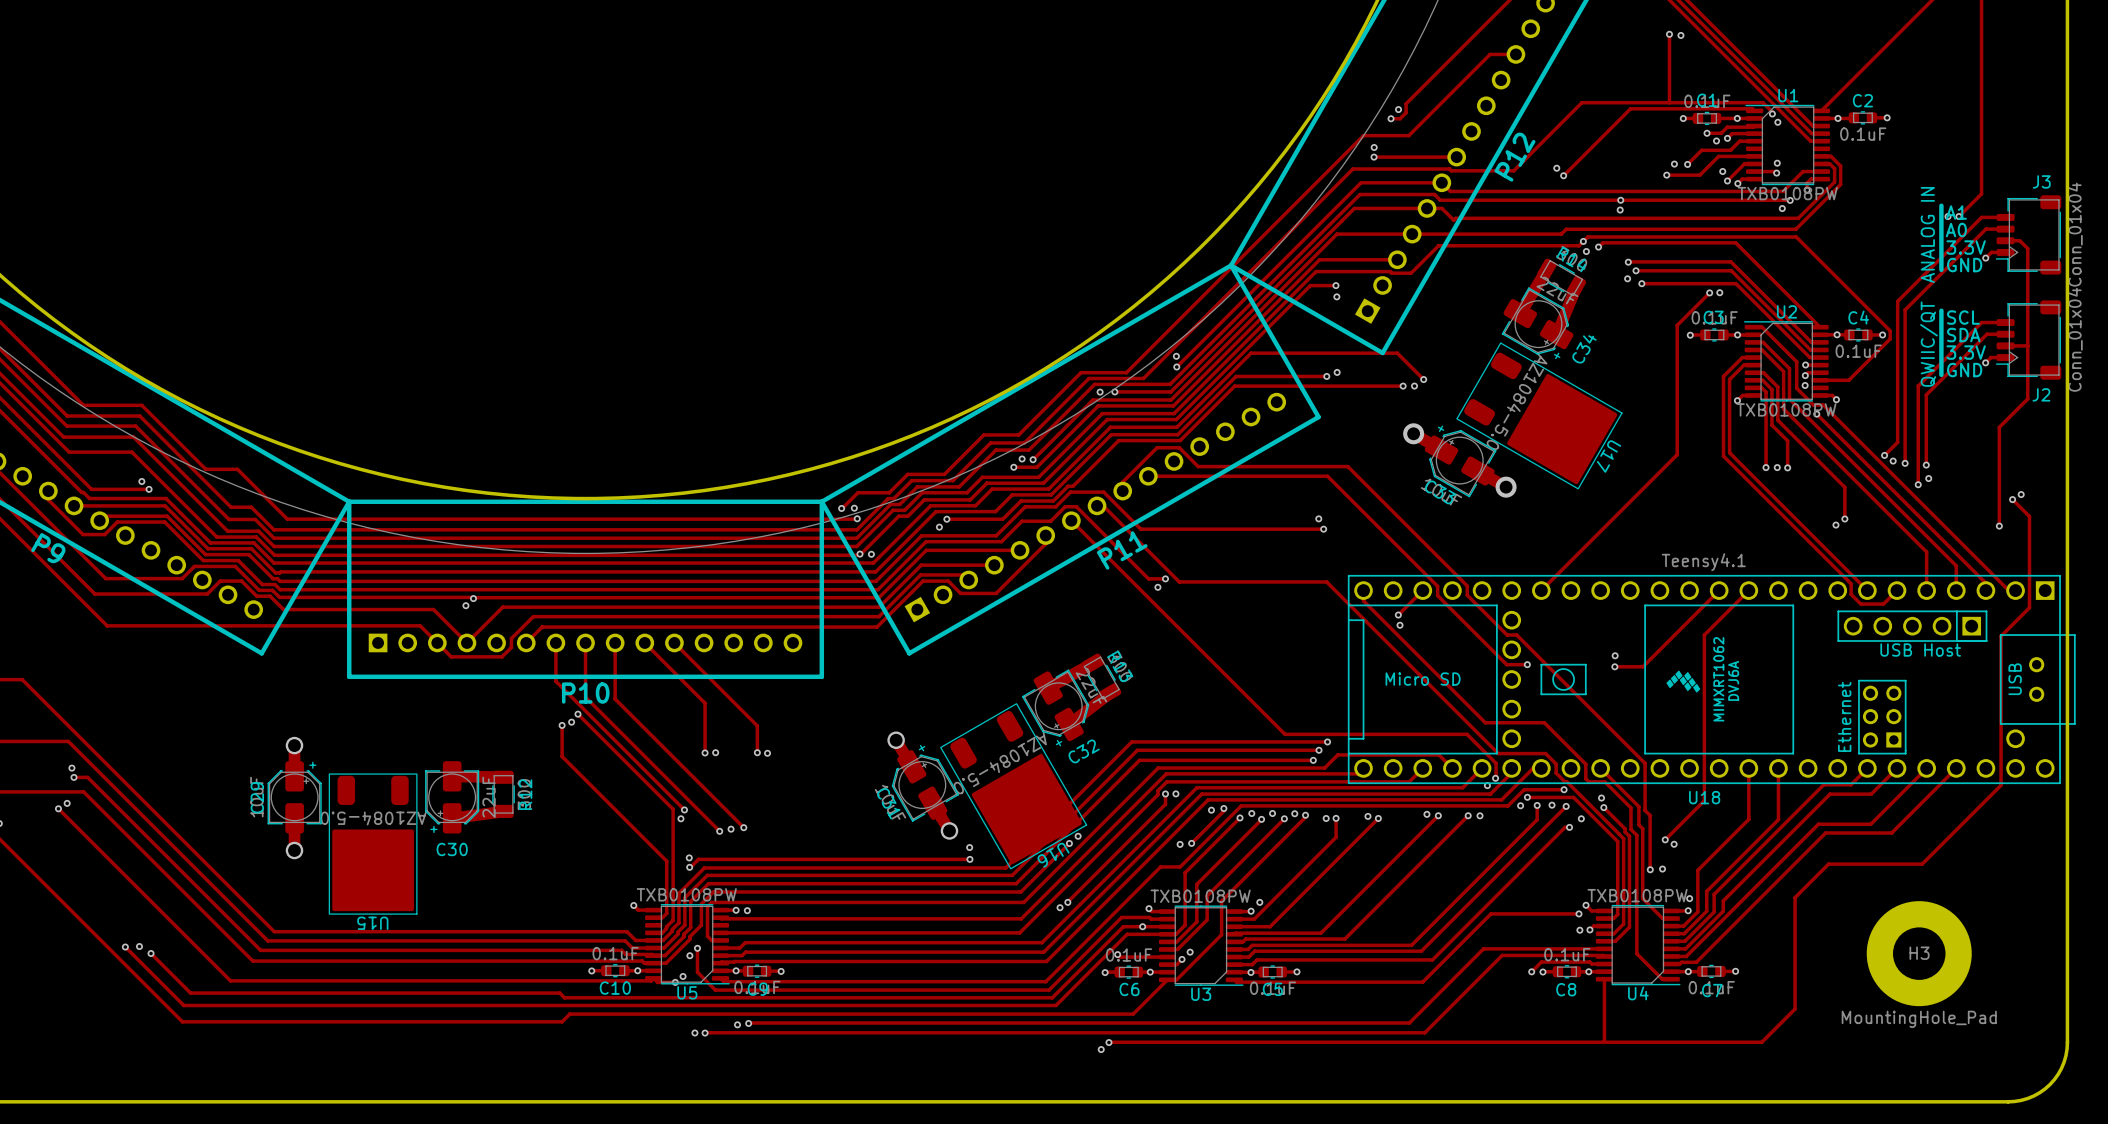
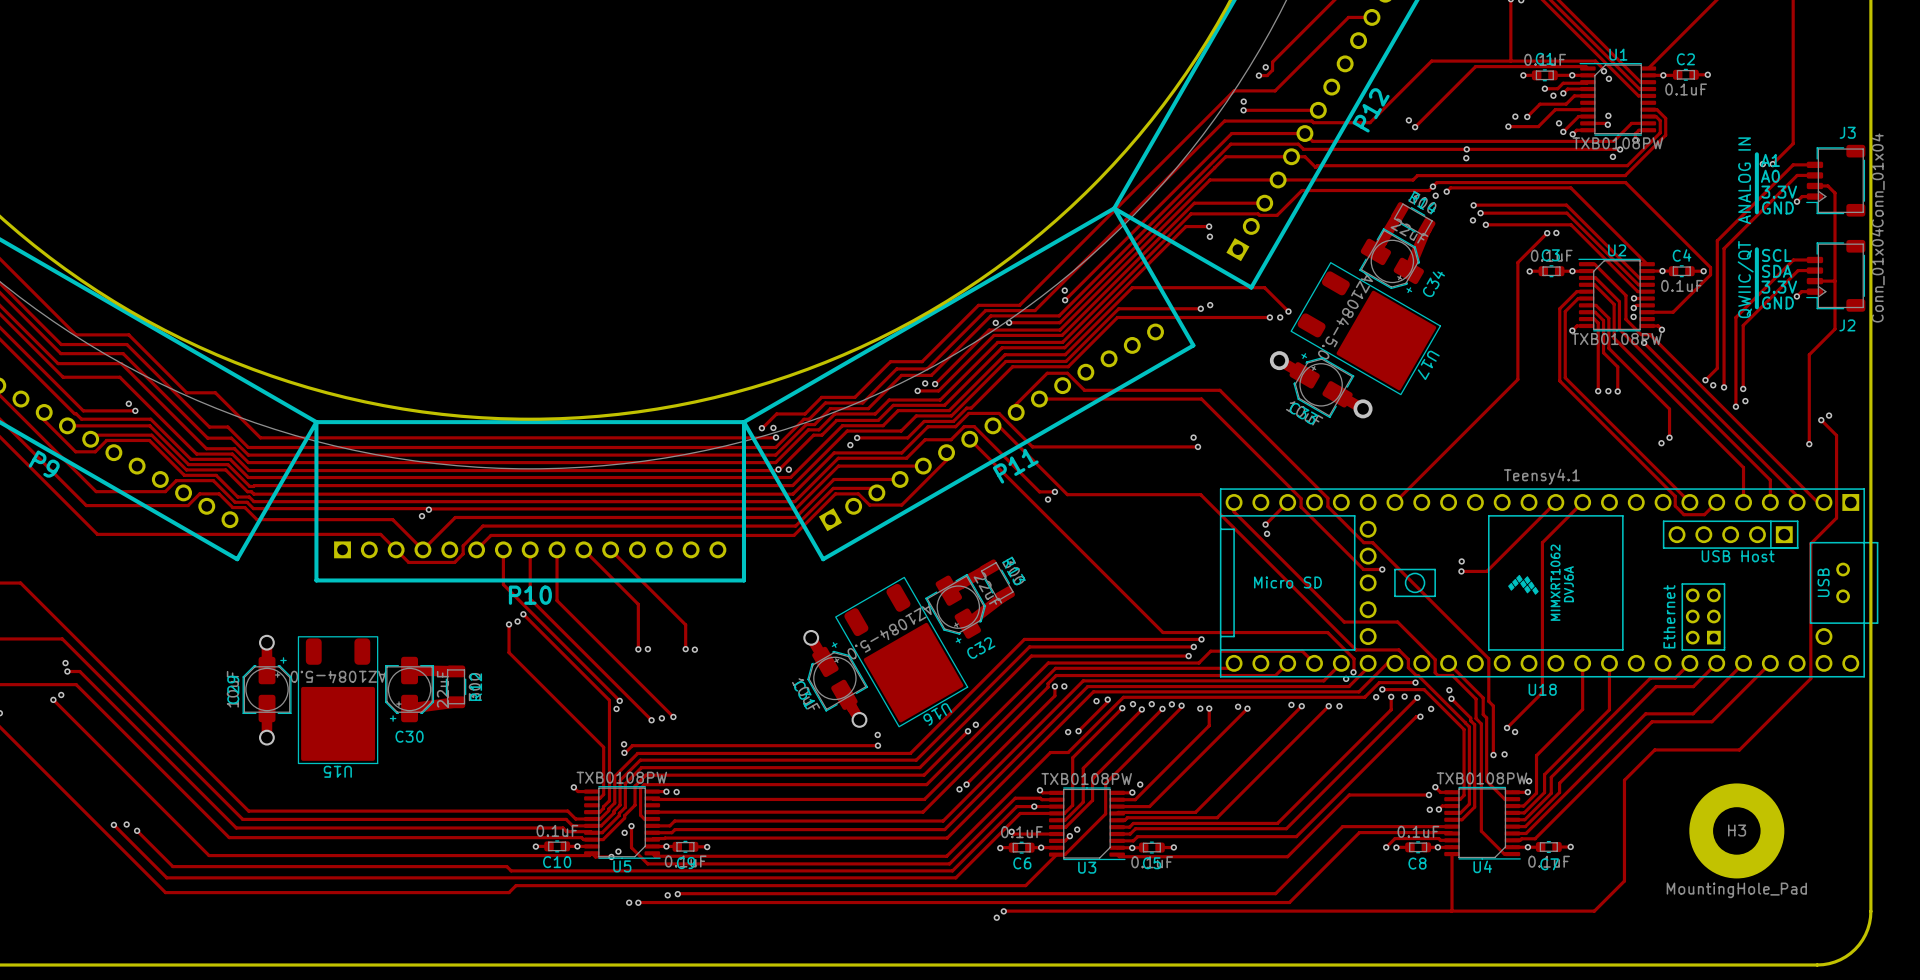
U17 position: (1539, 415) -> (1365, 328)
U16 position: (1013, 786) -> (901, 652)
U15 position: (373, 844) -> (338, 700)

